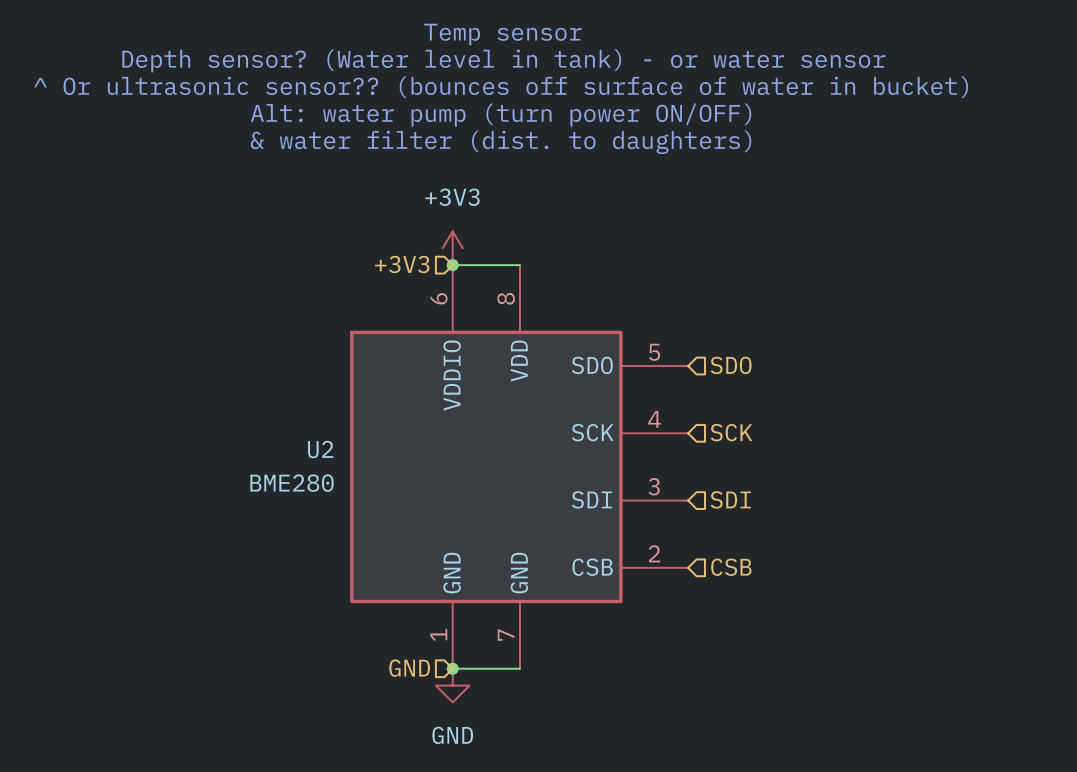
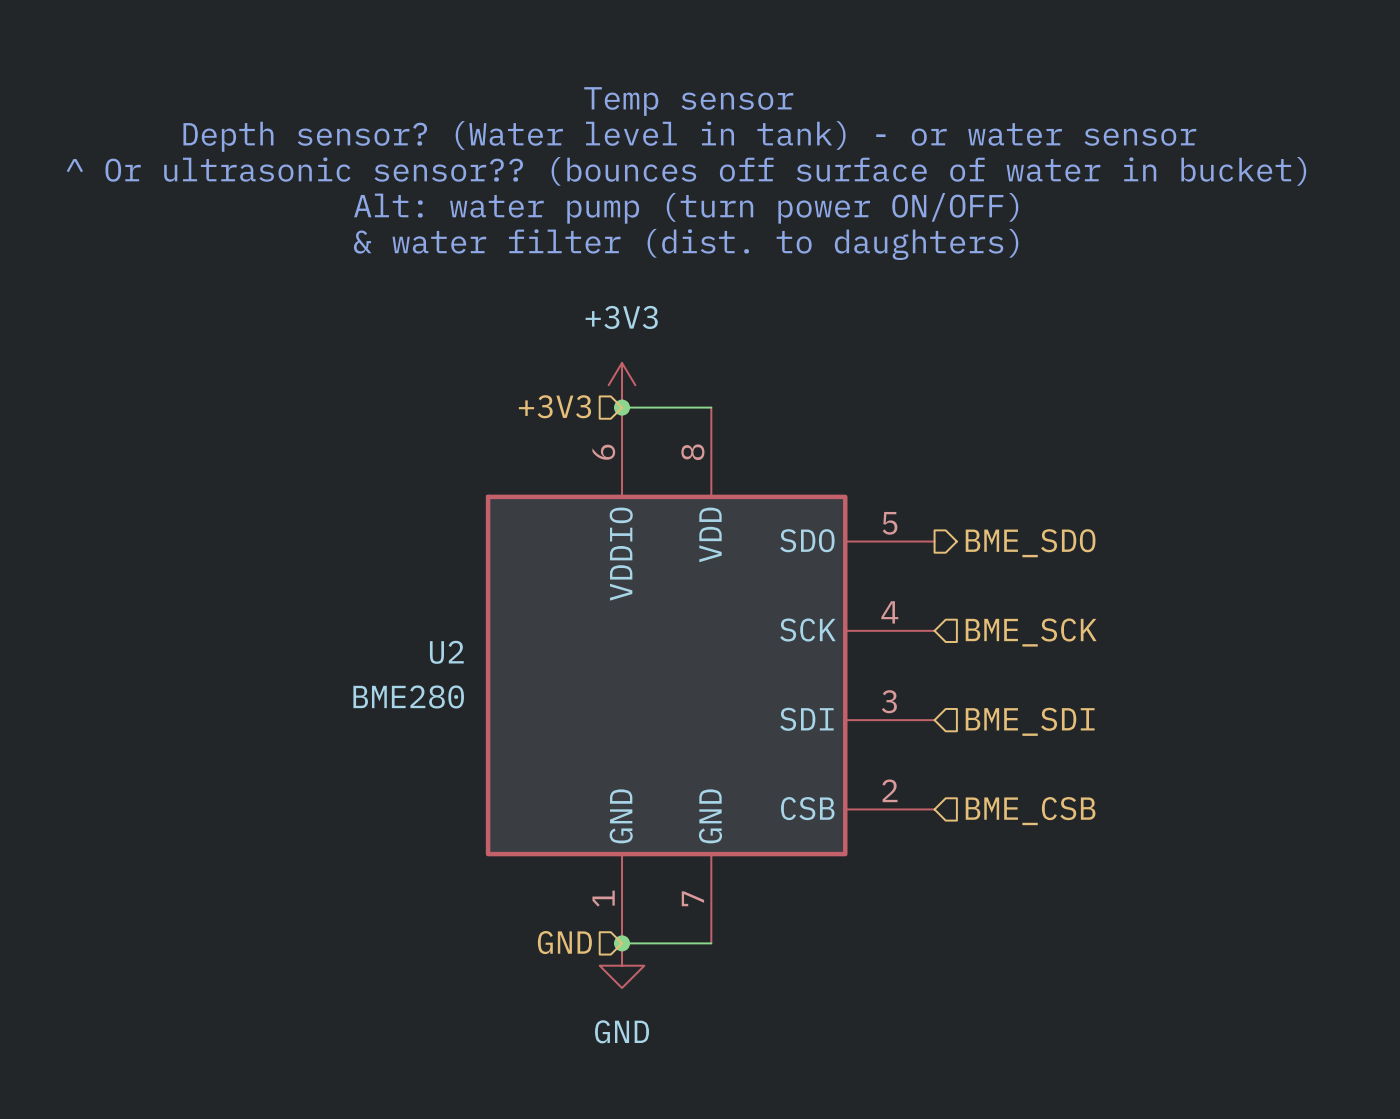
hierarchical label shape: input (731, 365) -> output (1030, 543)
hierarchical label: SDO (731, 365) -> BME_SDO (1030, 543)
hierarchical label: SCK (731, 432) -> BME_SCK (1031, 632)
hierarchical label: SDI (730, 499) -> BME_SDI (1030, 721)
hierarchical label: CSB (731, 567) -> BME_CSB (1030, 811)

